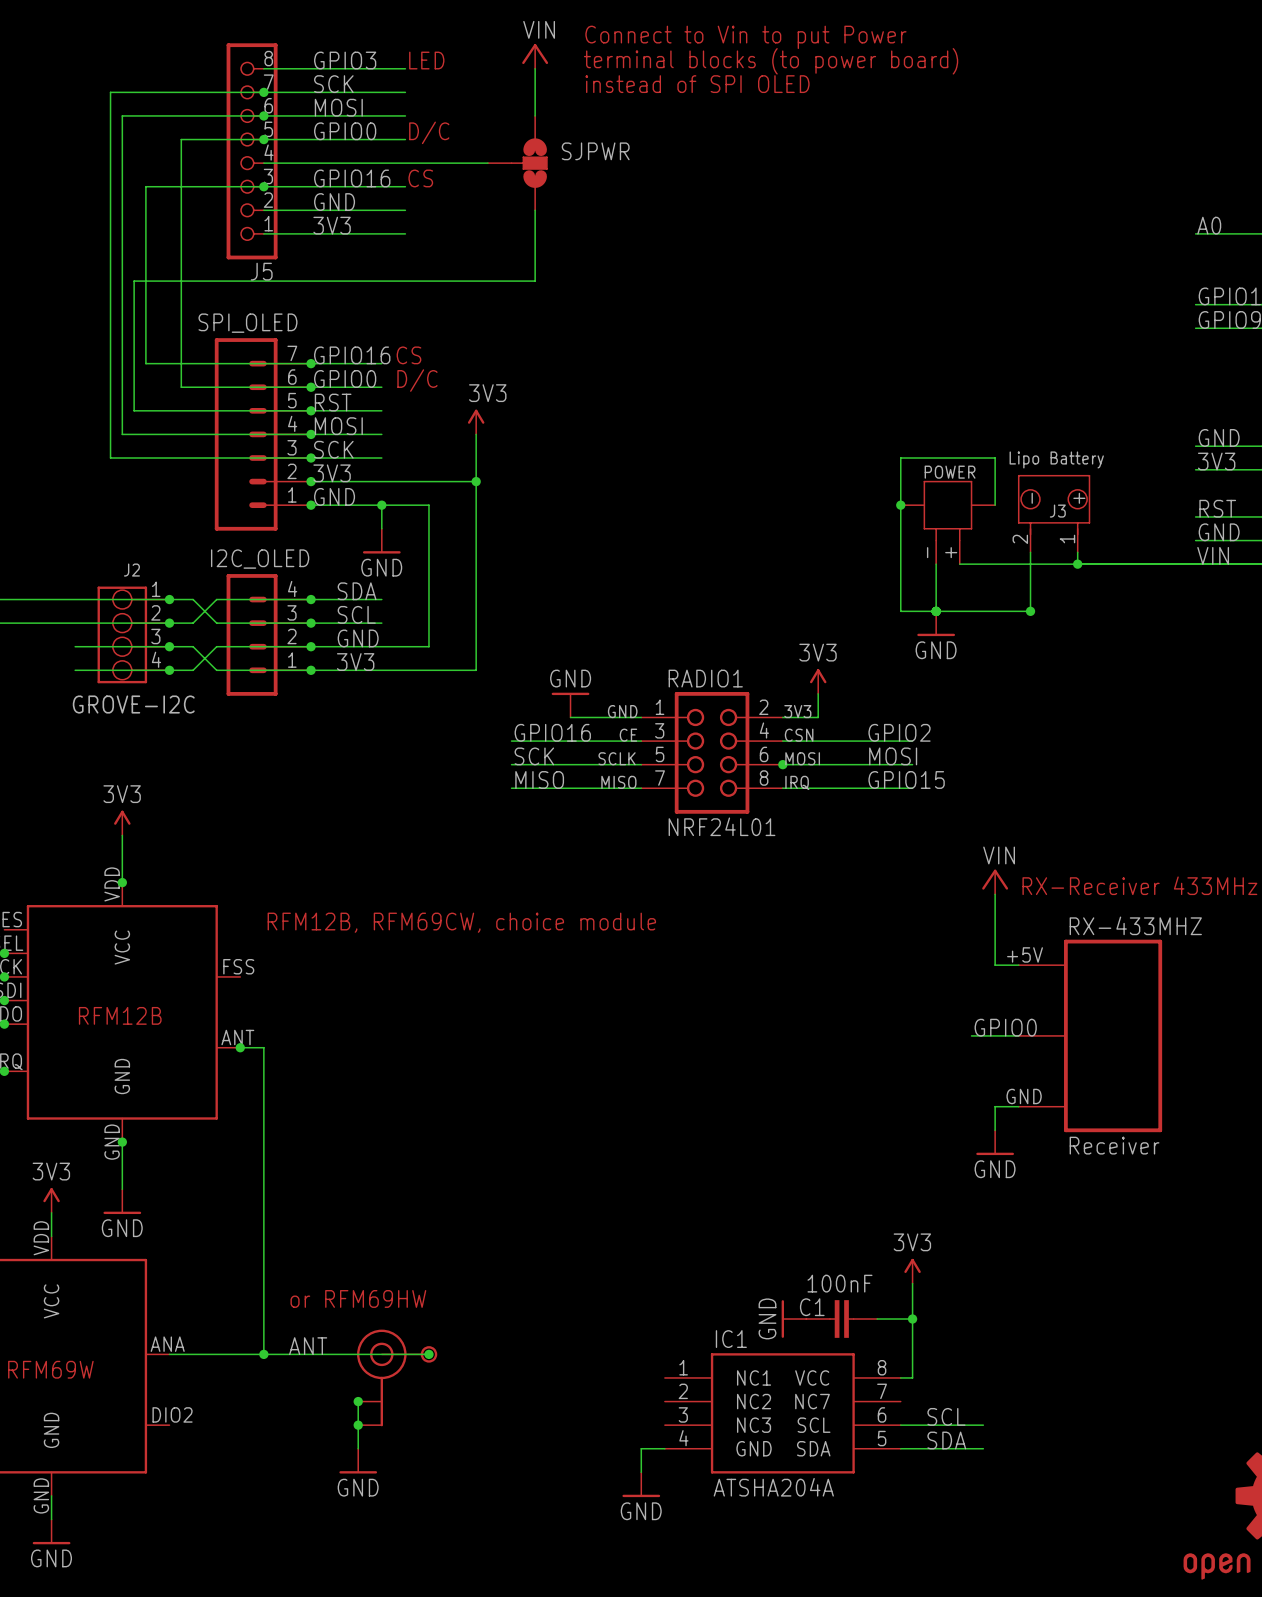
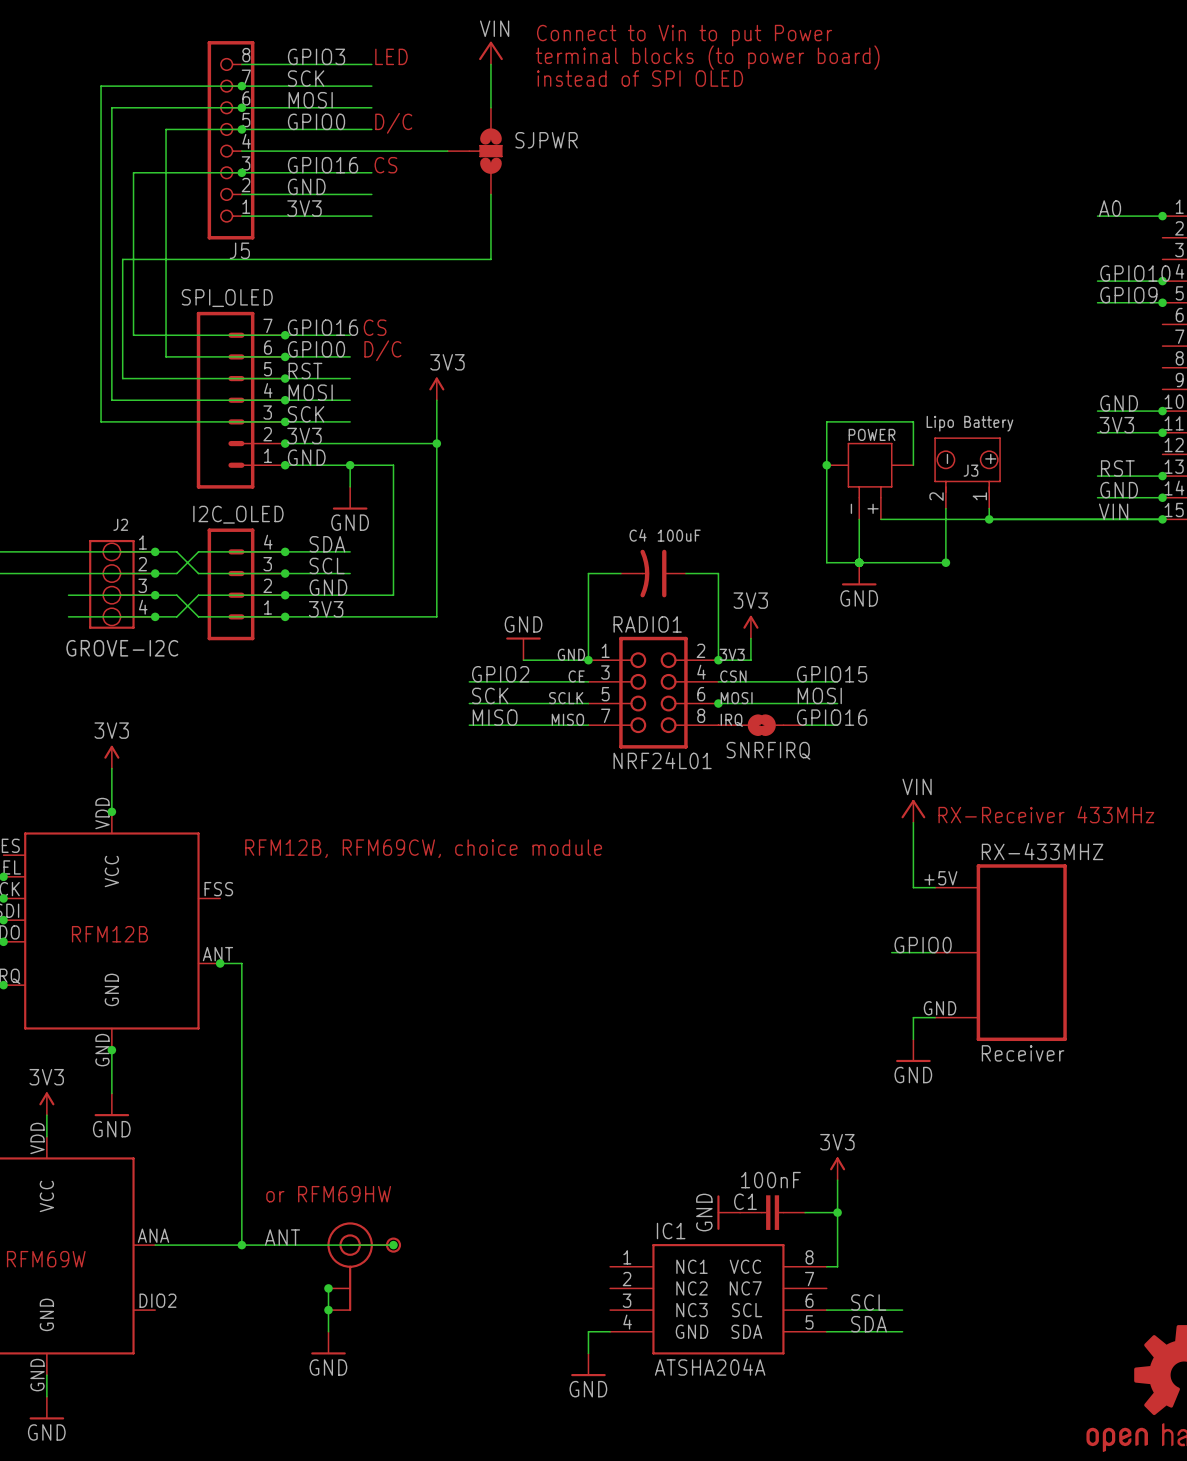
wire: none -> (620, 573) (588, 573) (588, 660)
C4: none -> 100uF (653, 573)
wire: none -> (685, 573) (718, 573) (718, 660)
junction: none -> (588, 660)
junction: none -> (718, 660)
label: GPIO16 (552, 732) -> GPIO2 (500, 674)
label: GPIO2 (899, 732) -> GPIO15 (832, 674)
label: GPIO15 (906, 779) -> GPIO16 (832, 717)
SNRFIRQ: none -> (761, 725)

